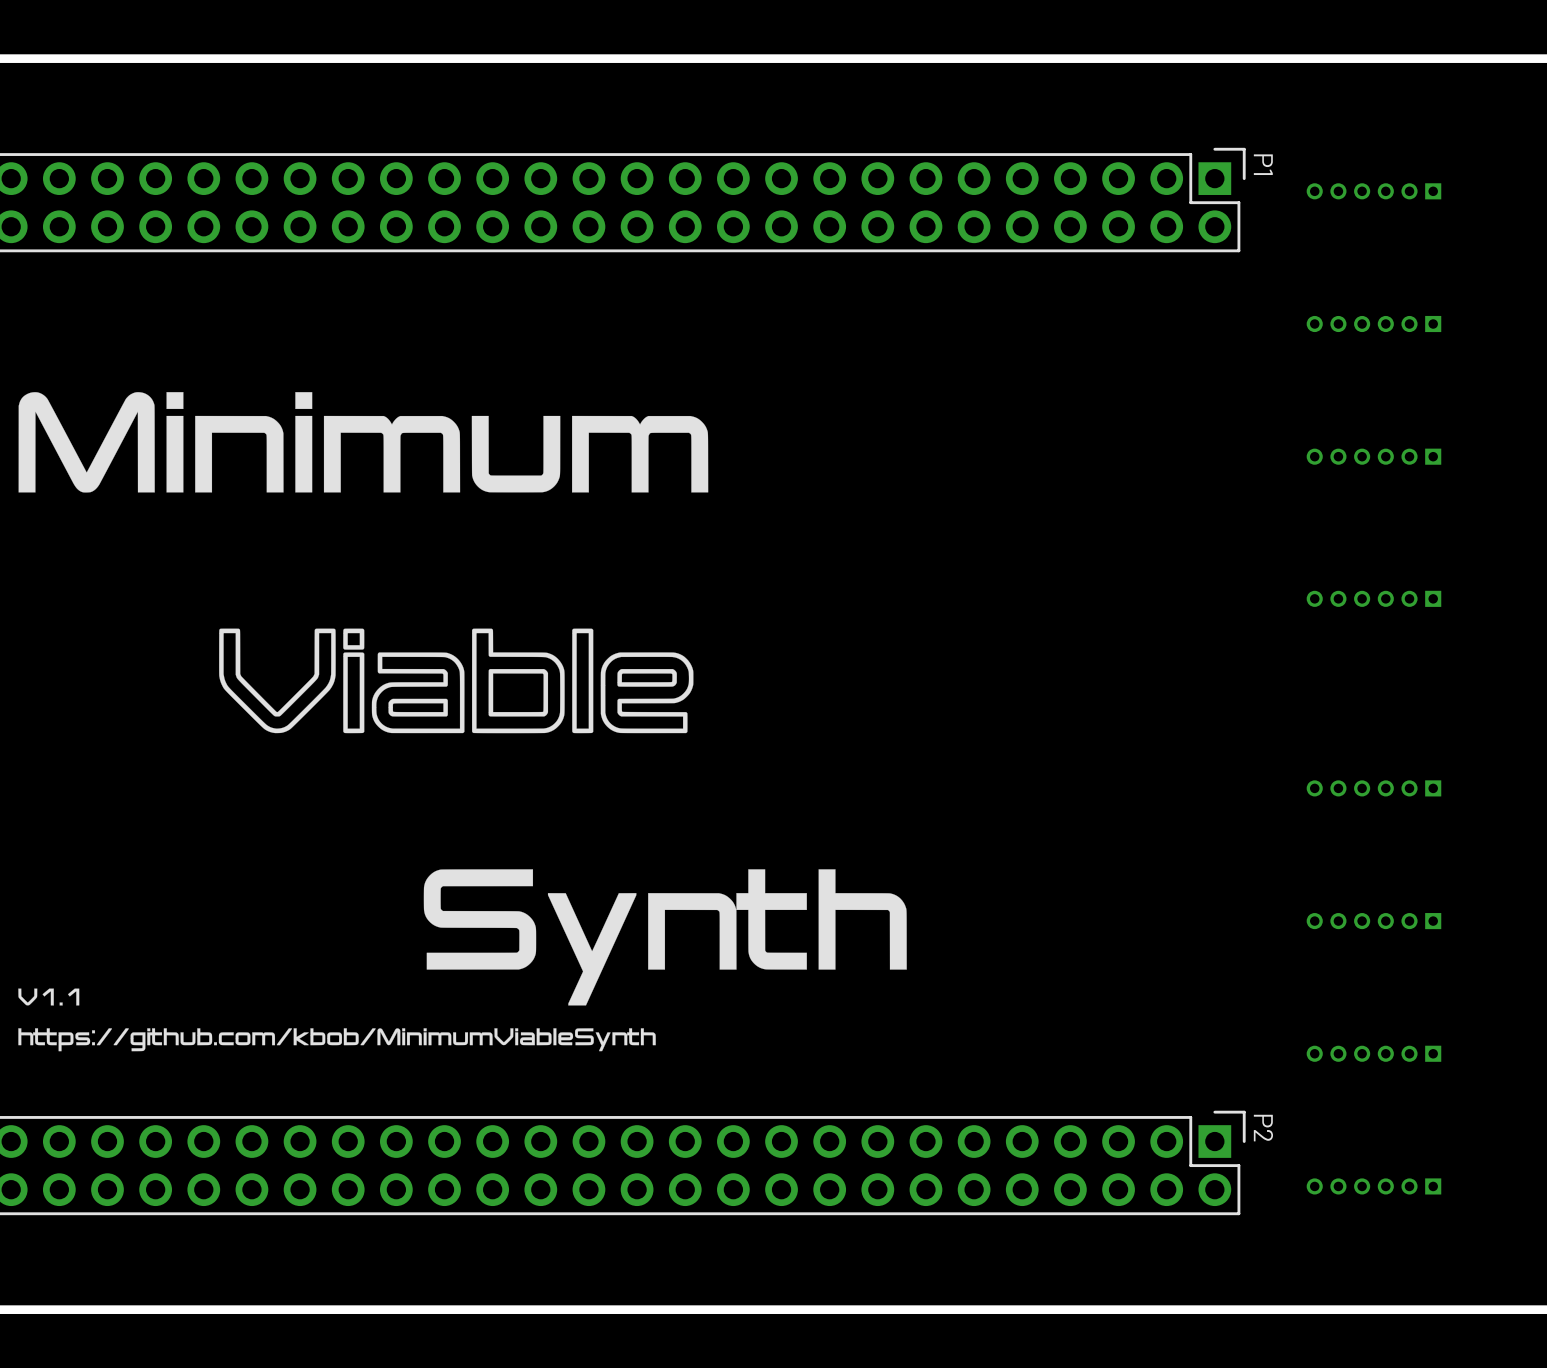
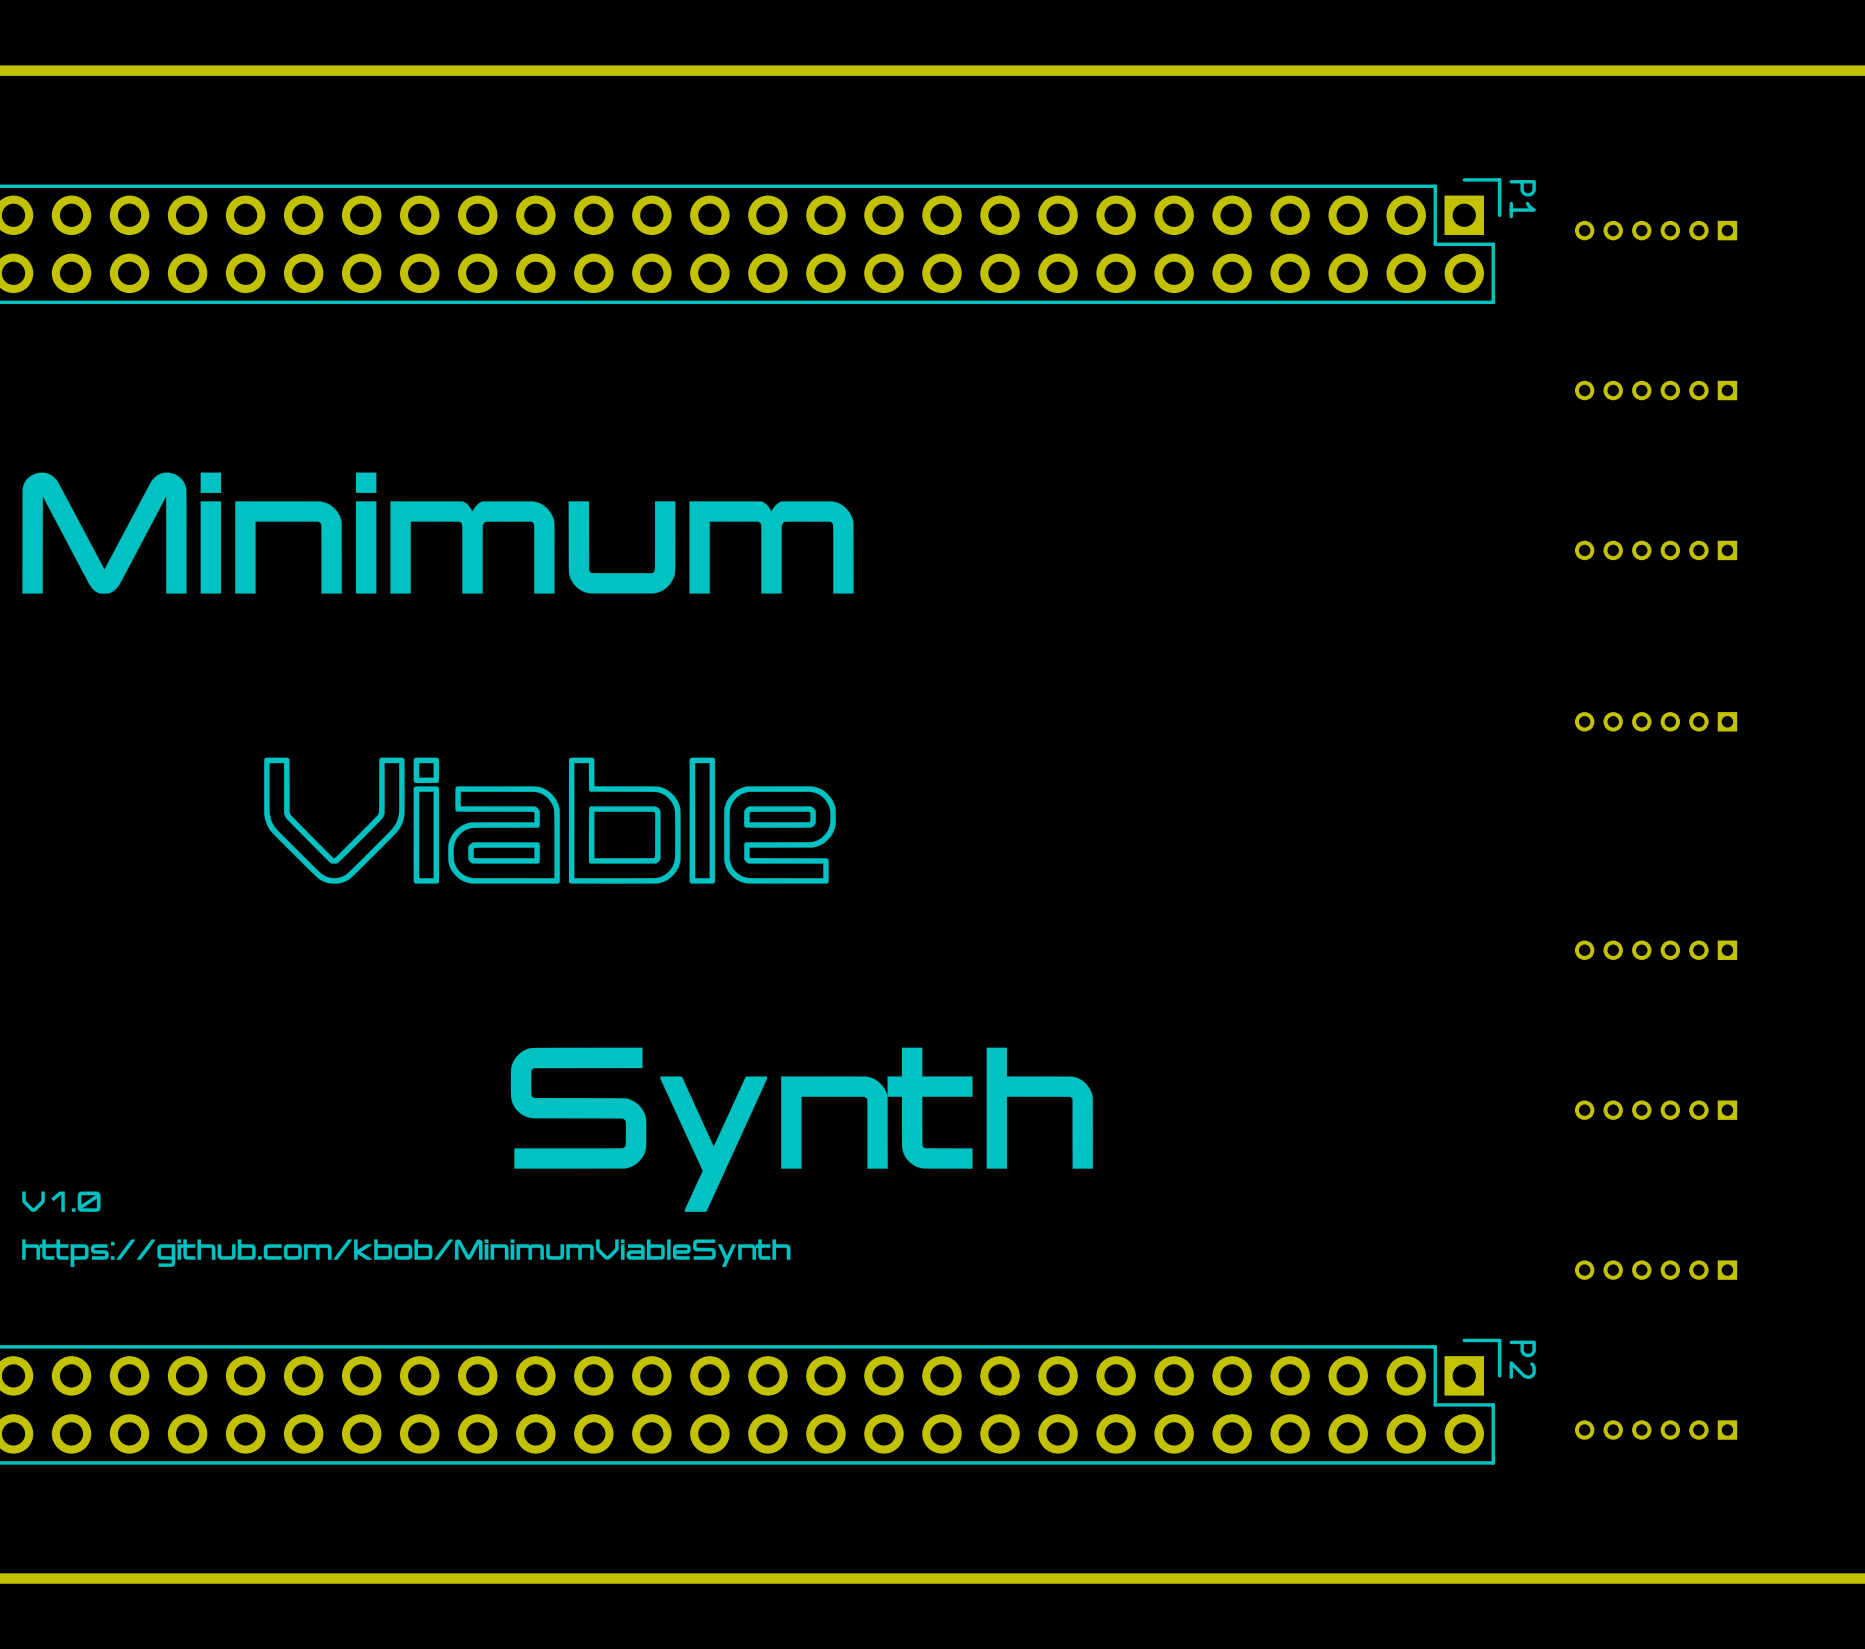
drawing shape: [18, 392, 907, 1052] -> [22, 472, 1093, 1268]

